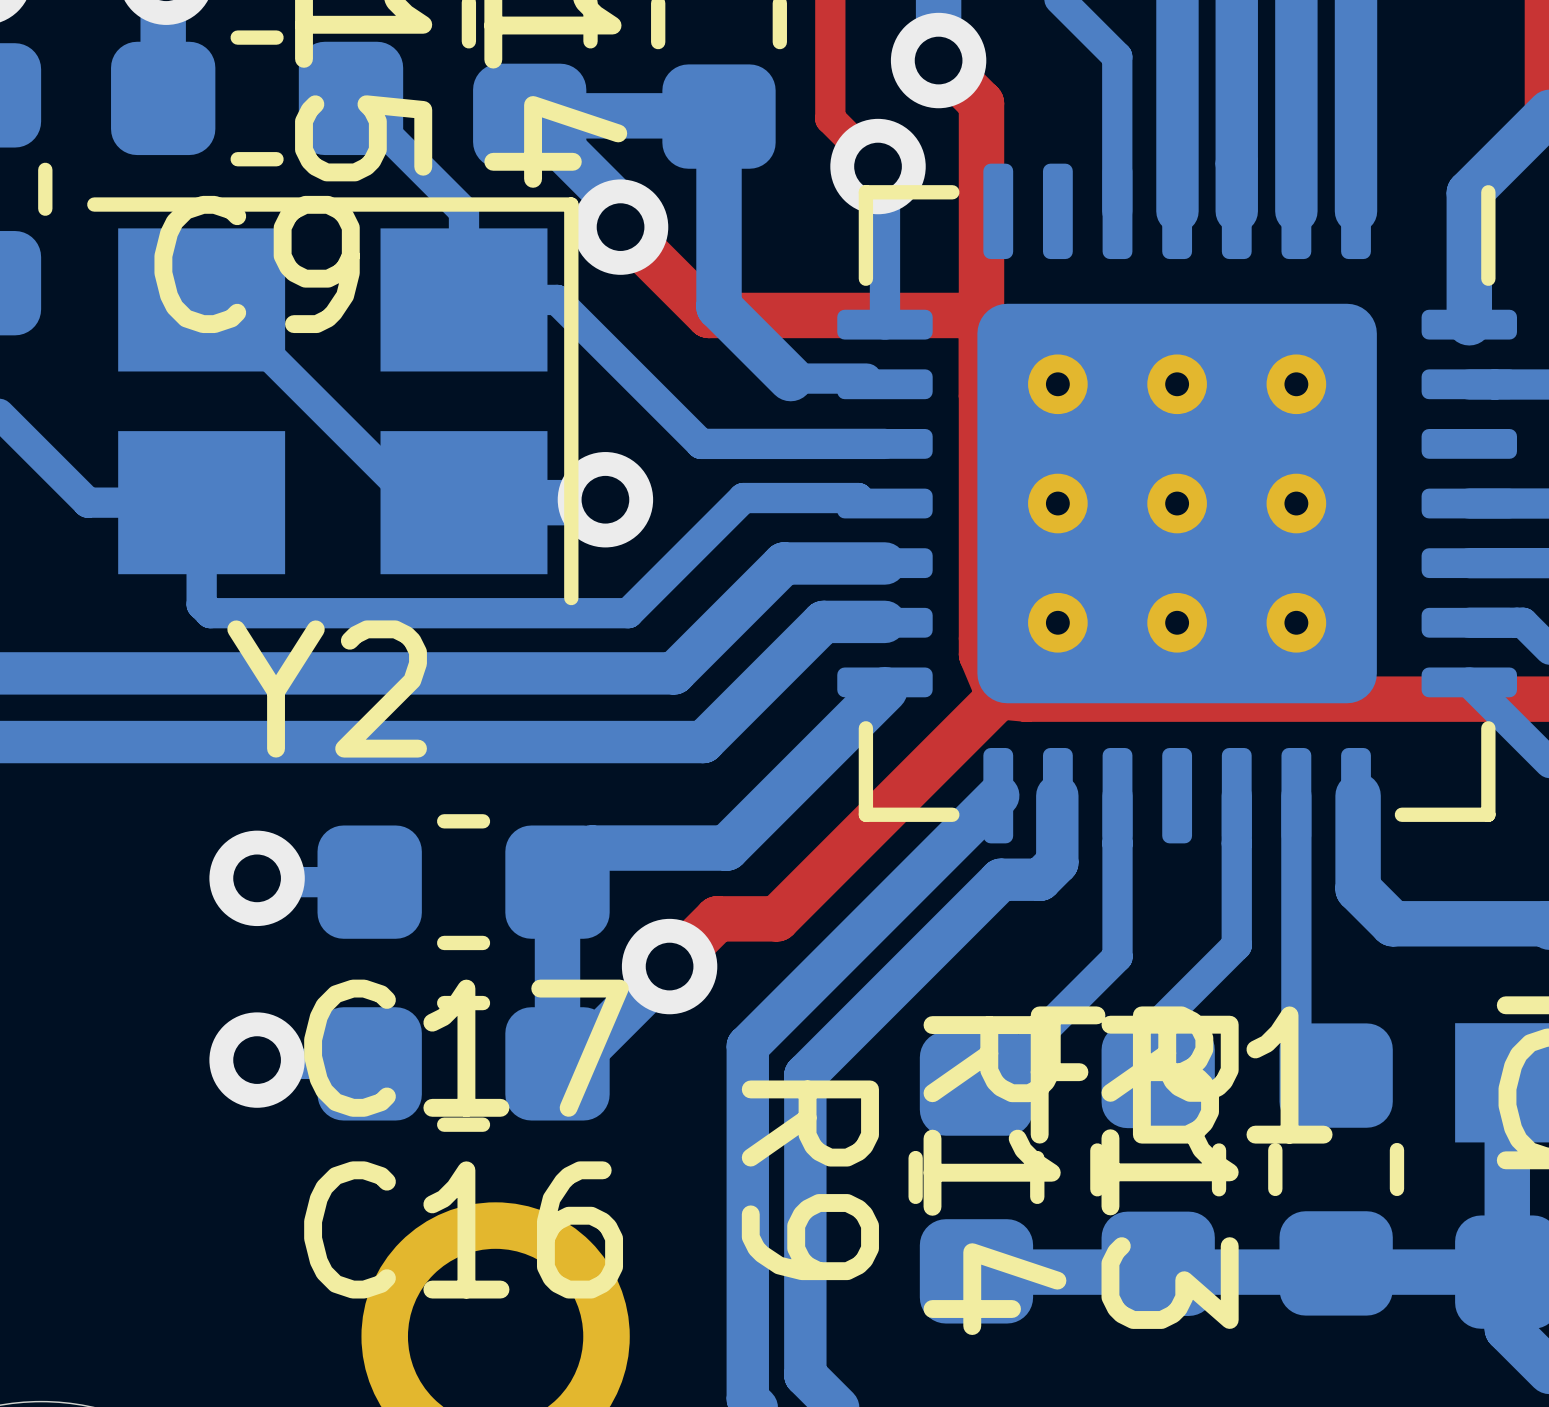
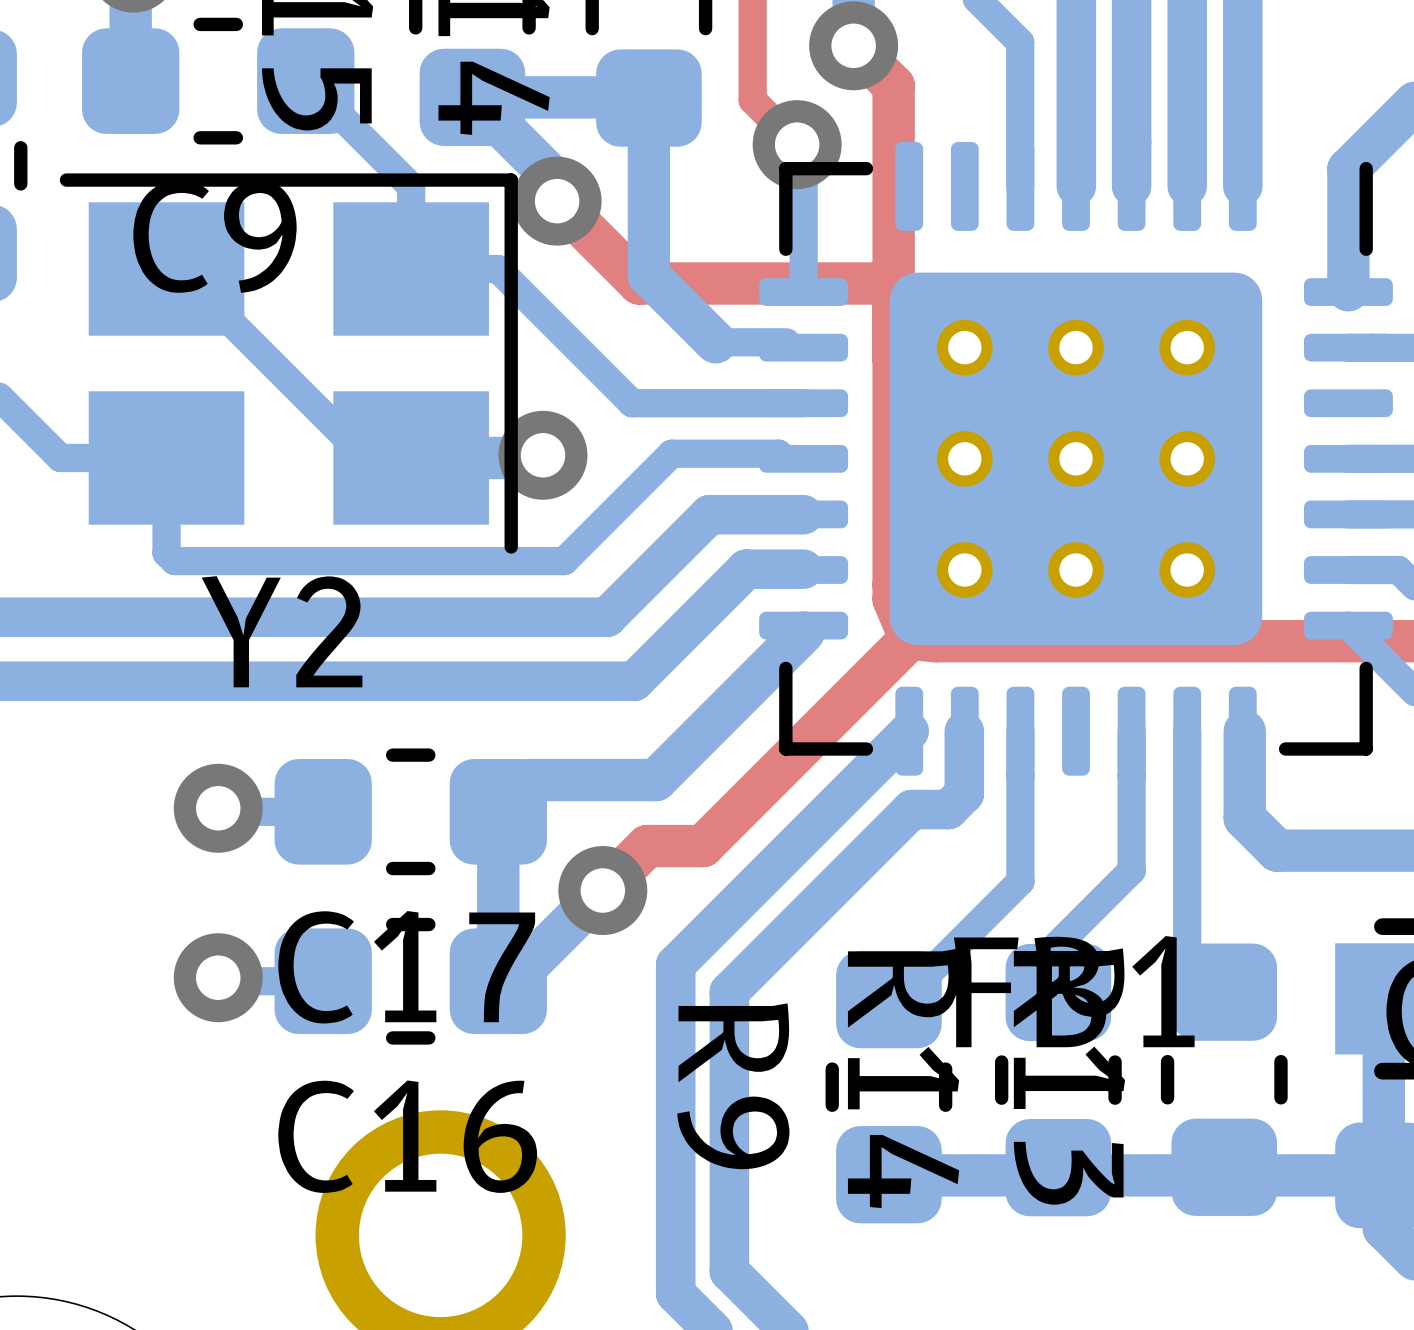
part footprint: [837, 163, 1518, 844] -> [759, 141, 1393, 776]

